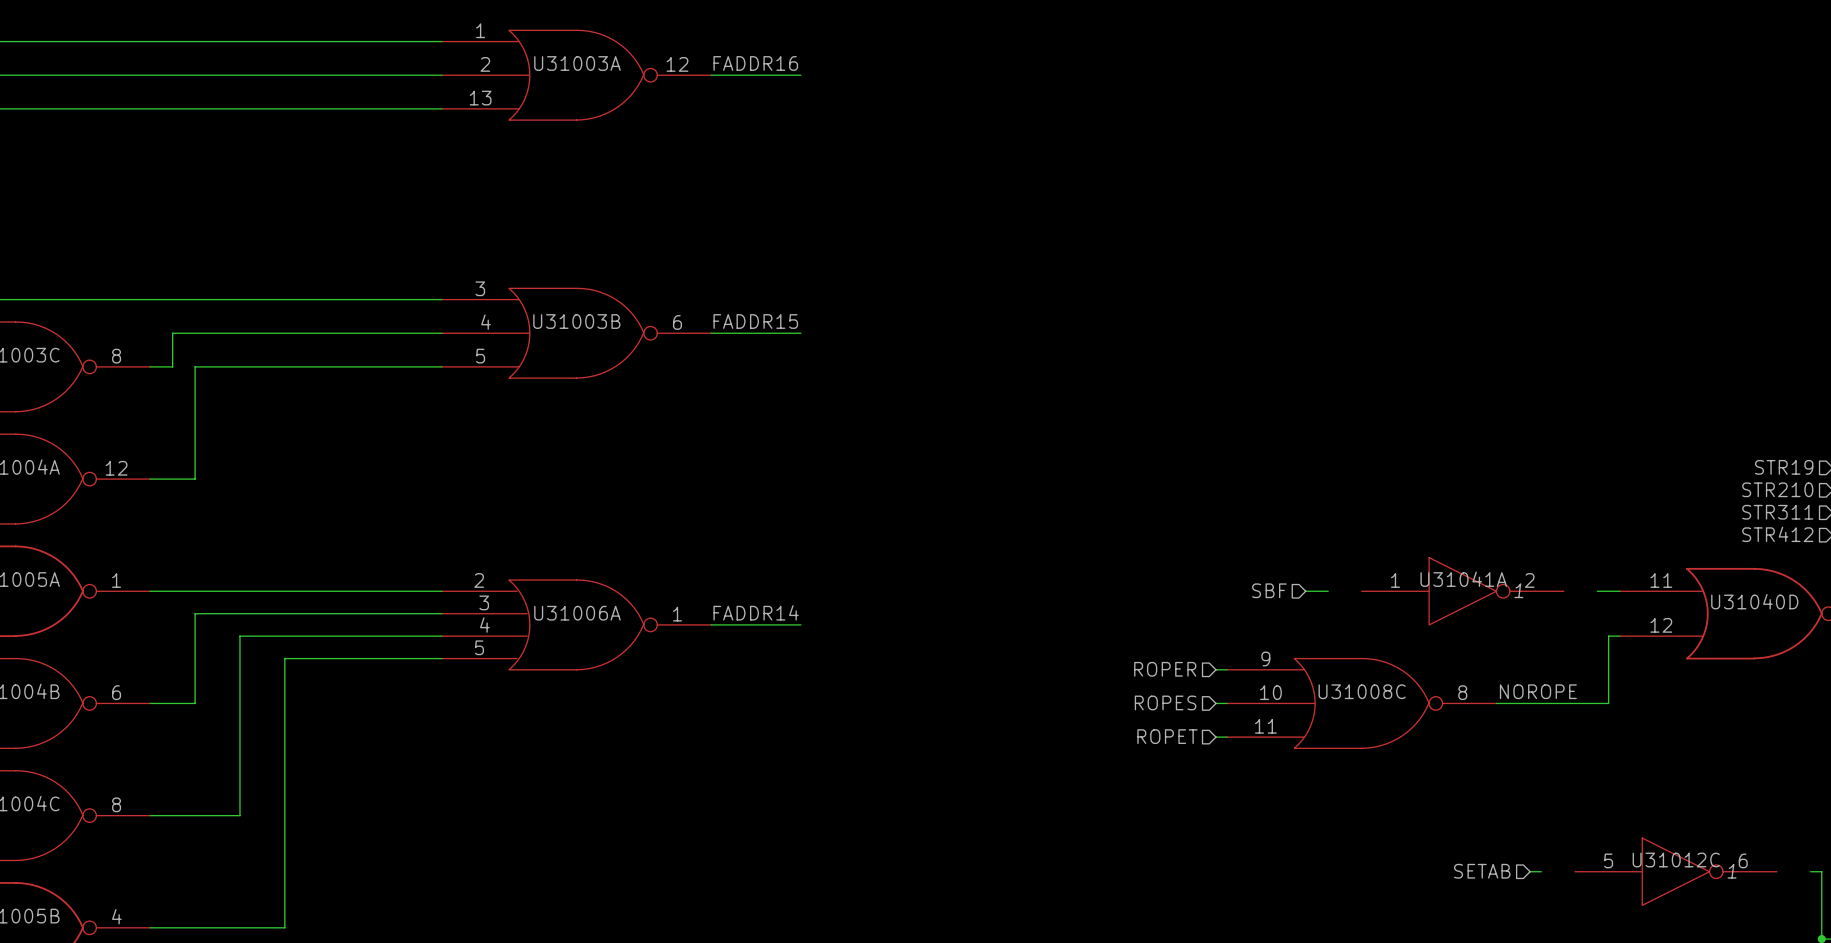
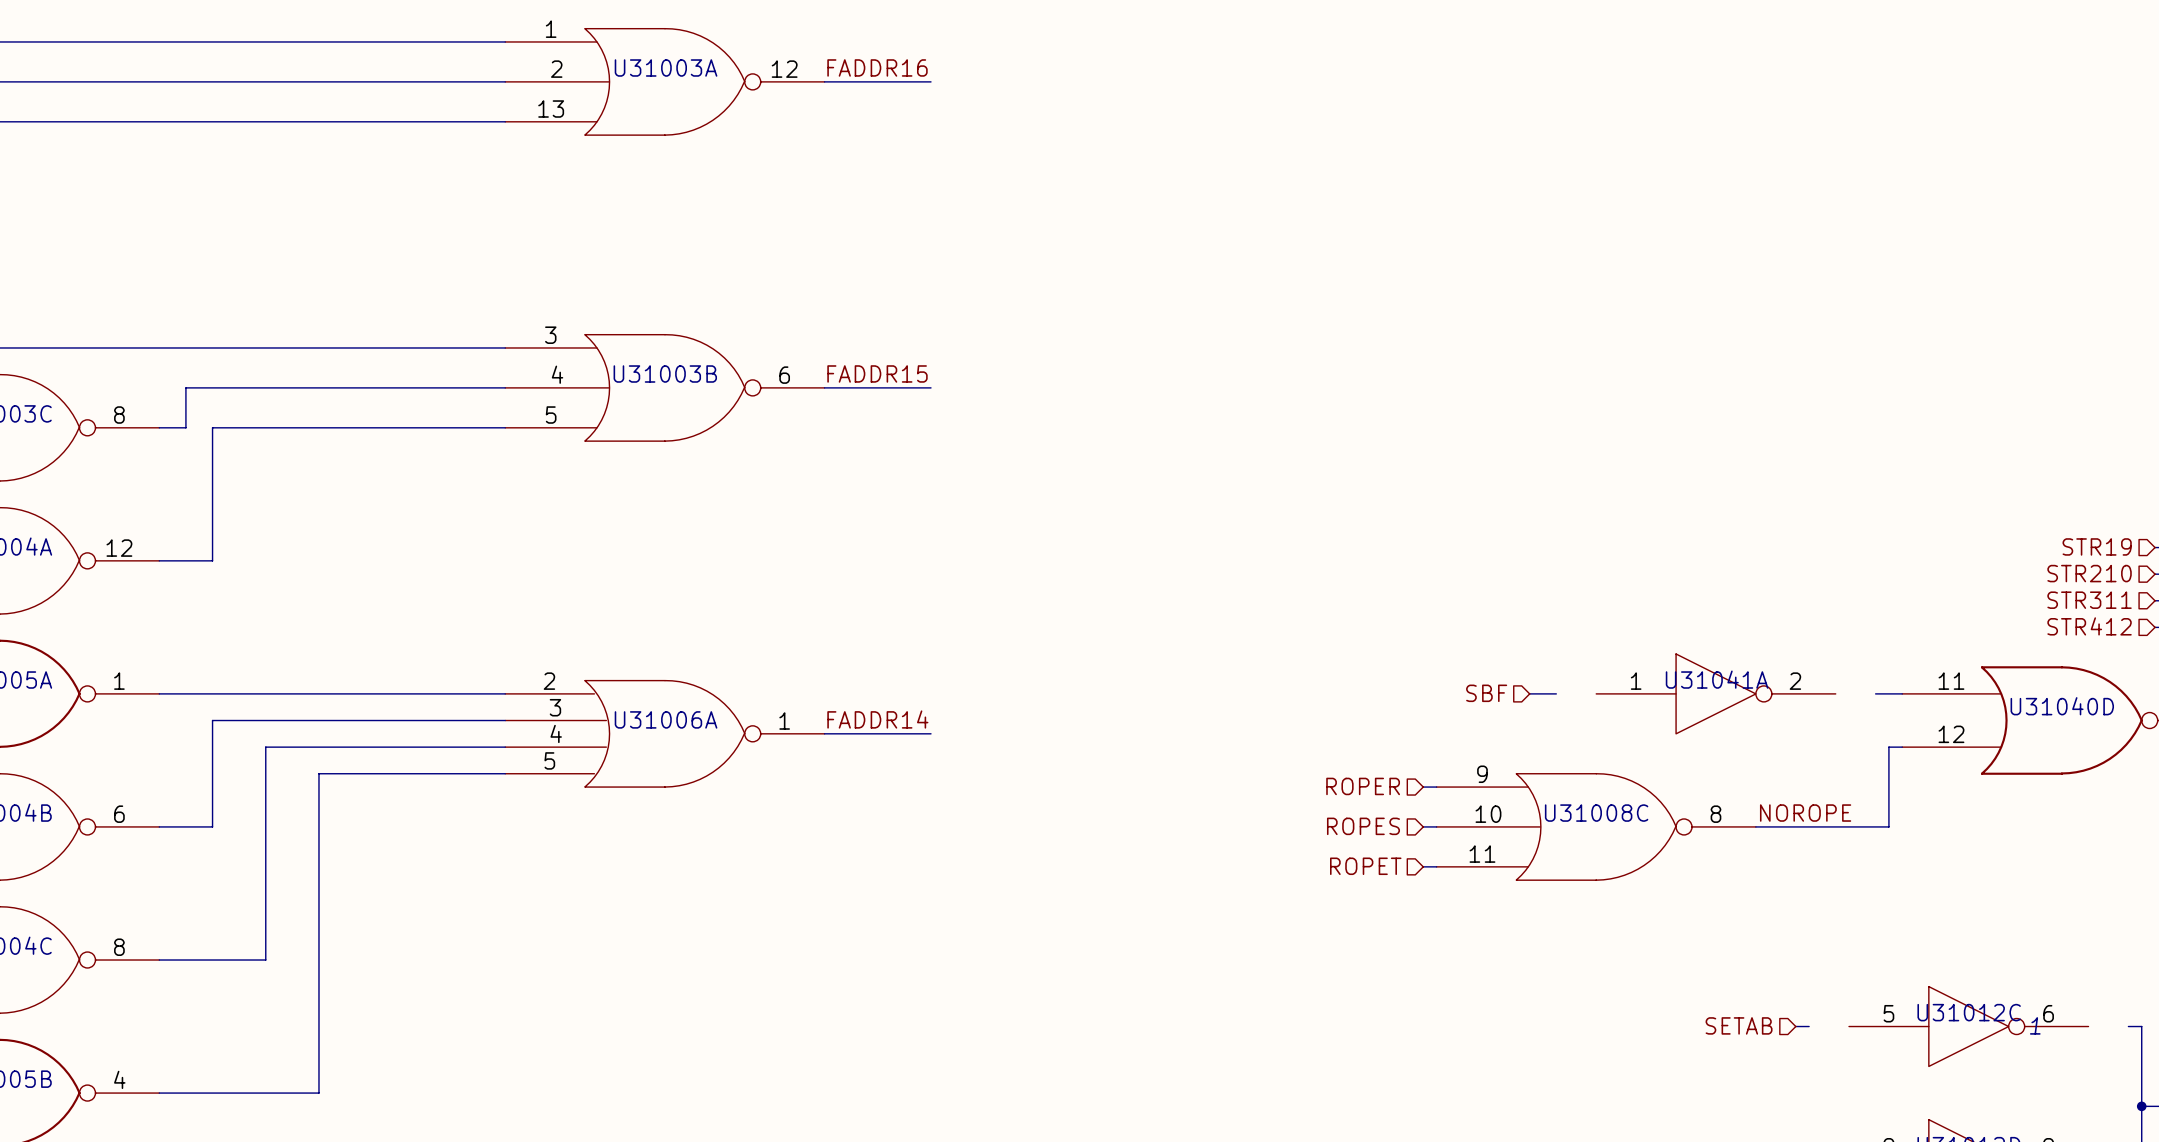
U31041A text: 1 (1518, 590) -> none

